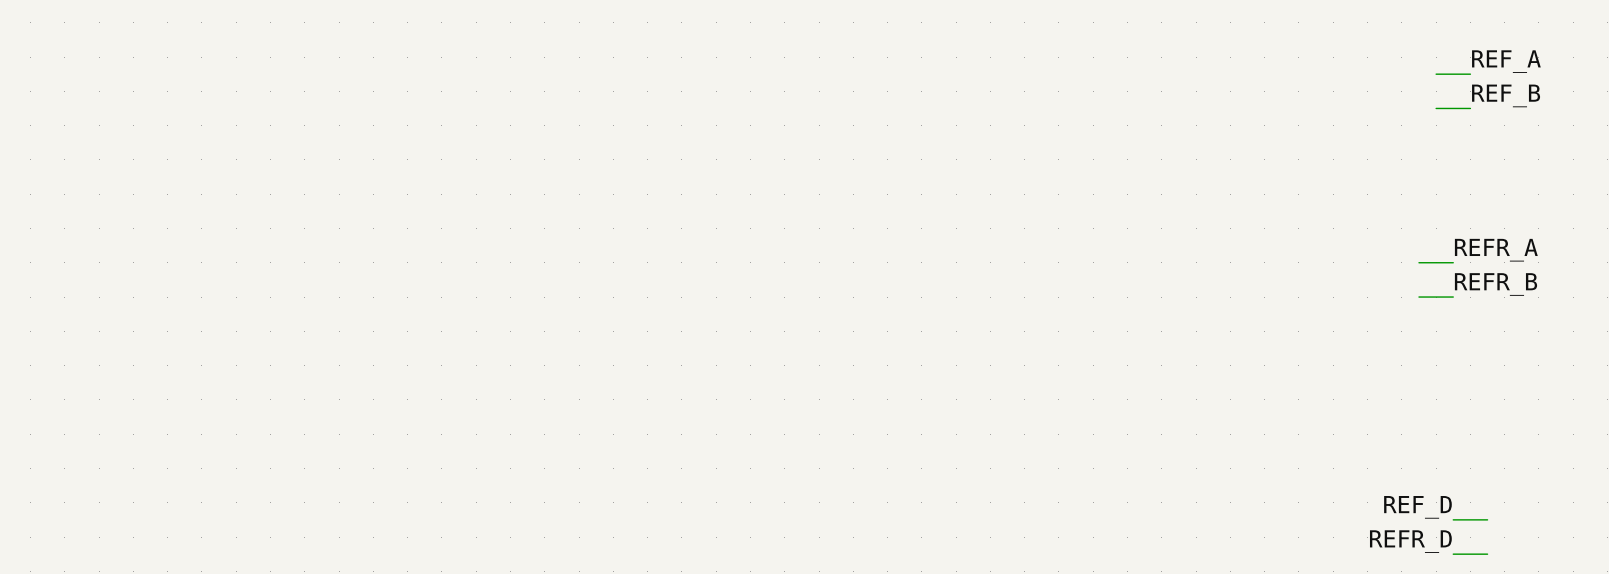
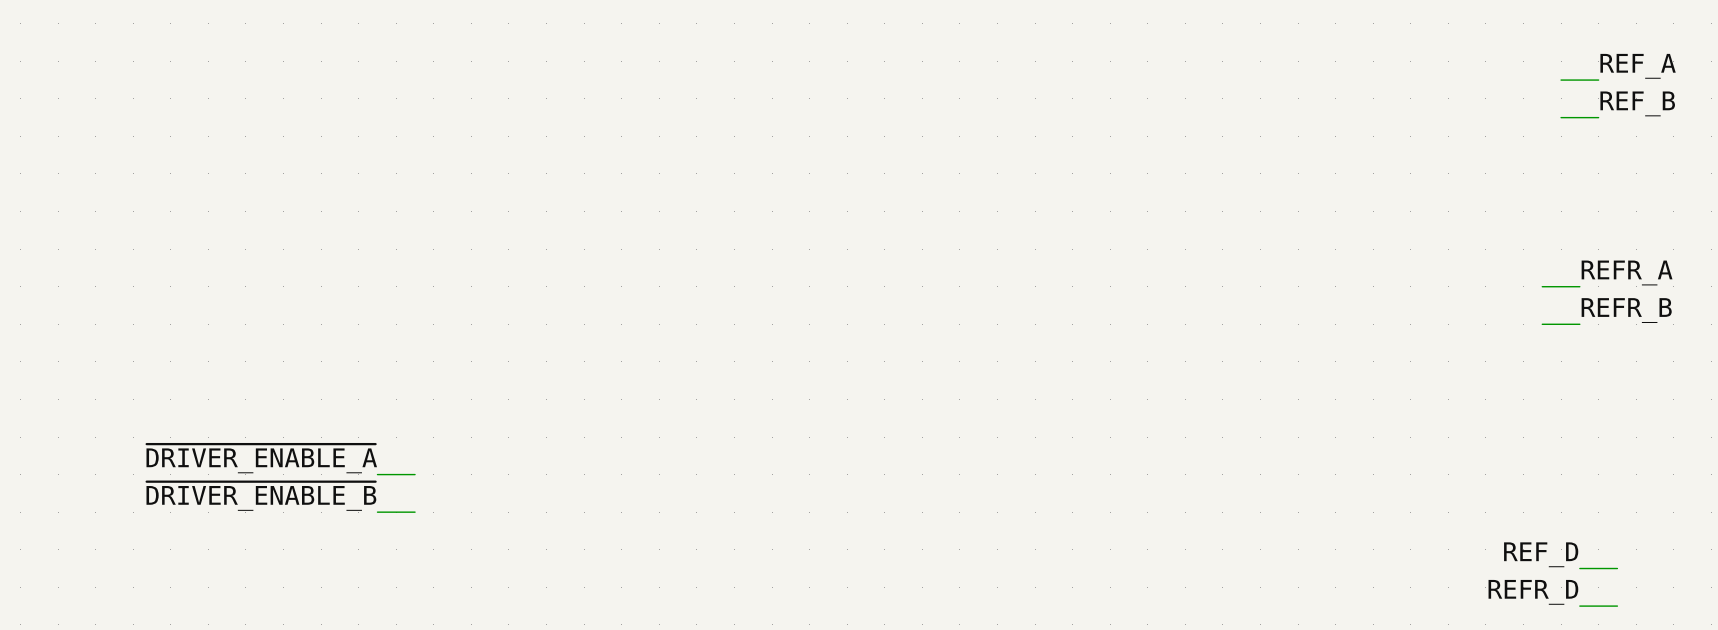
label: none -> ~{DRIVER_ENABLE_A} (261, 458)
wire: none -> (377, 474) (415, 474)
label: none -> ~{DRIVER_ENABLE_B} (261, 496)
wire: none -> (377, 512) (415, 512)

